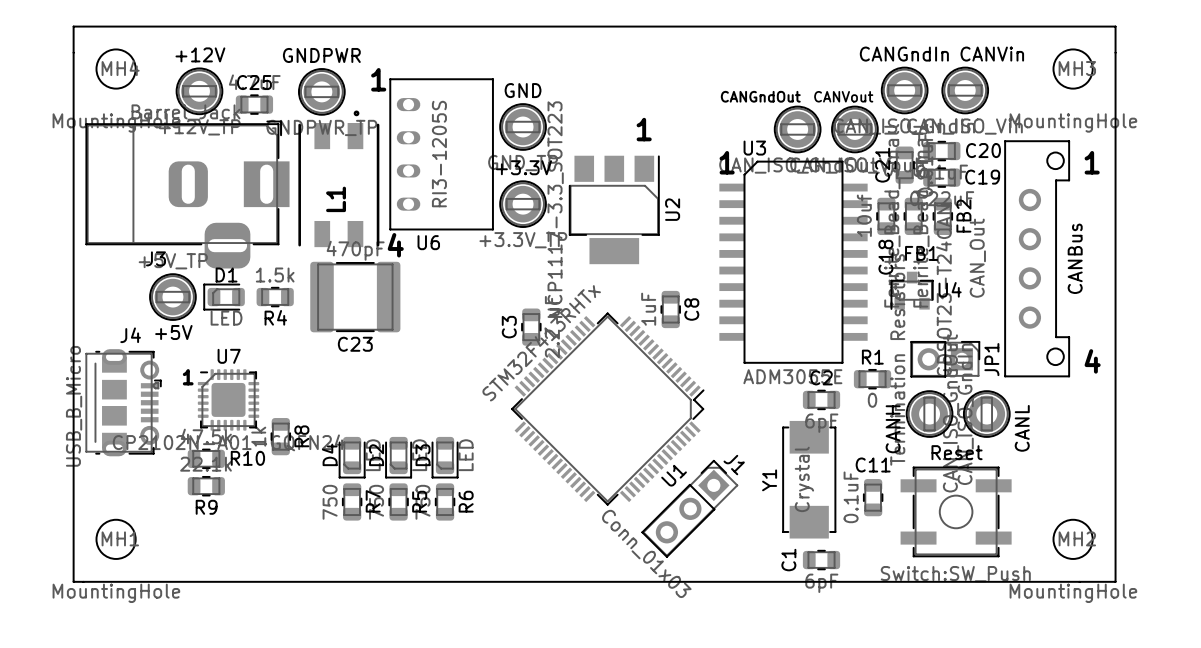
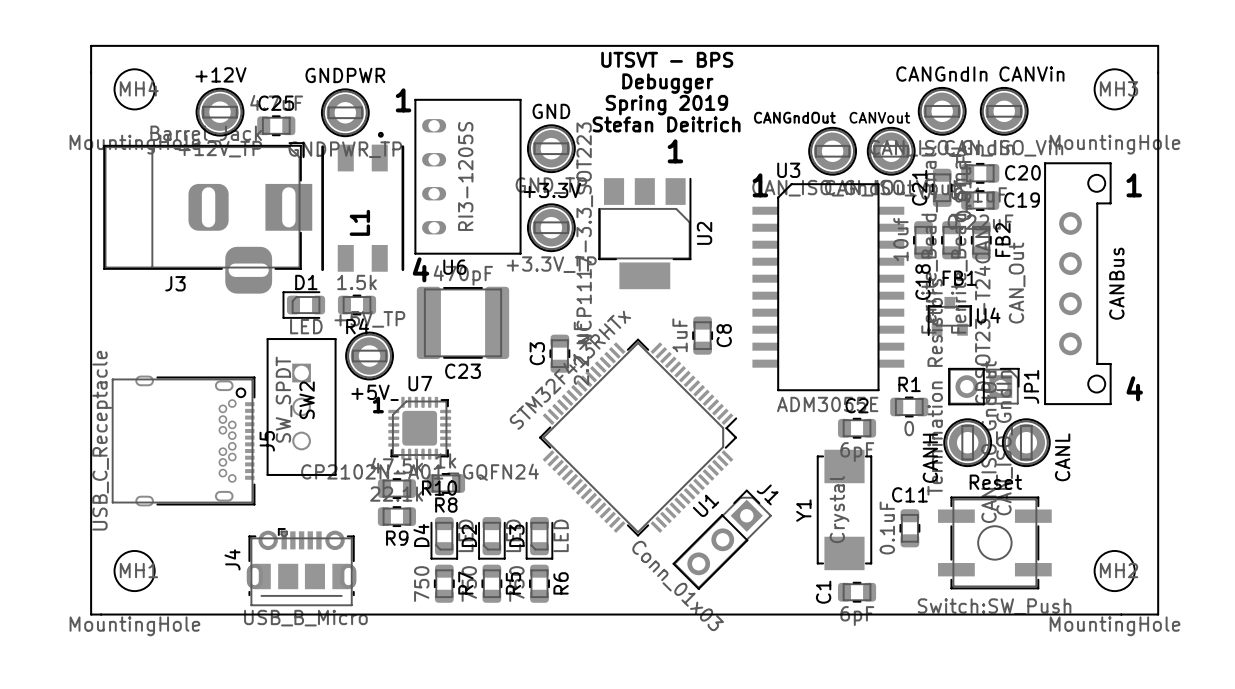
text: none -> UTSVT - BPS (667, 59)
text: none -> Debugger (667, 83)
text: none -> Spring 2019 (666, 105)
text: none -> Stefan Deitrich (666, 124)
+5V position: (172, 297) -> (369, 356)
D1 position: (224, 297) -> (303, 305)
R4 position: (275, 297) -> (357, 305)
C23 position: (355, 297) -> (463, 322)
text position: 1 (188, 377) -> 1 (378, 405)
SW2: none -> SW_SPDT (301, 407)
U7 position: (228, 399) -> (419, 428)
J4 rotation: 0° (123, 402) -> 90° counterclockwise (301, 567)
J4 position: (123, 402) -> (301, 567)
J5: none -> USB_C_Receptacle (183, 440)
R8 rotation: 0° (280, 436) -> 90° clockwise (446, 483)
R8 position: (280, 436) -> (446, 483)
D4 position: (352, 457) -> (444, 538)
D2 position: (398, 457) -> (491, 538)
D3 position: (445, 457) -> (539, 538)
R10 position: (206, 458) -> (396, 488)
R9 position: (206, 486) -> (396, 516)
R7 position: (352, 501) -> (444, 583)
R5 position: (398, 501) -> (491, 583)
R6 position: (445, 501) -> (539, 583)

